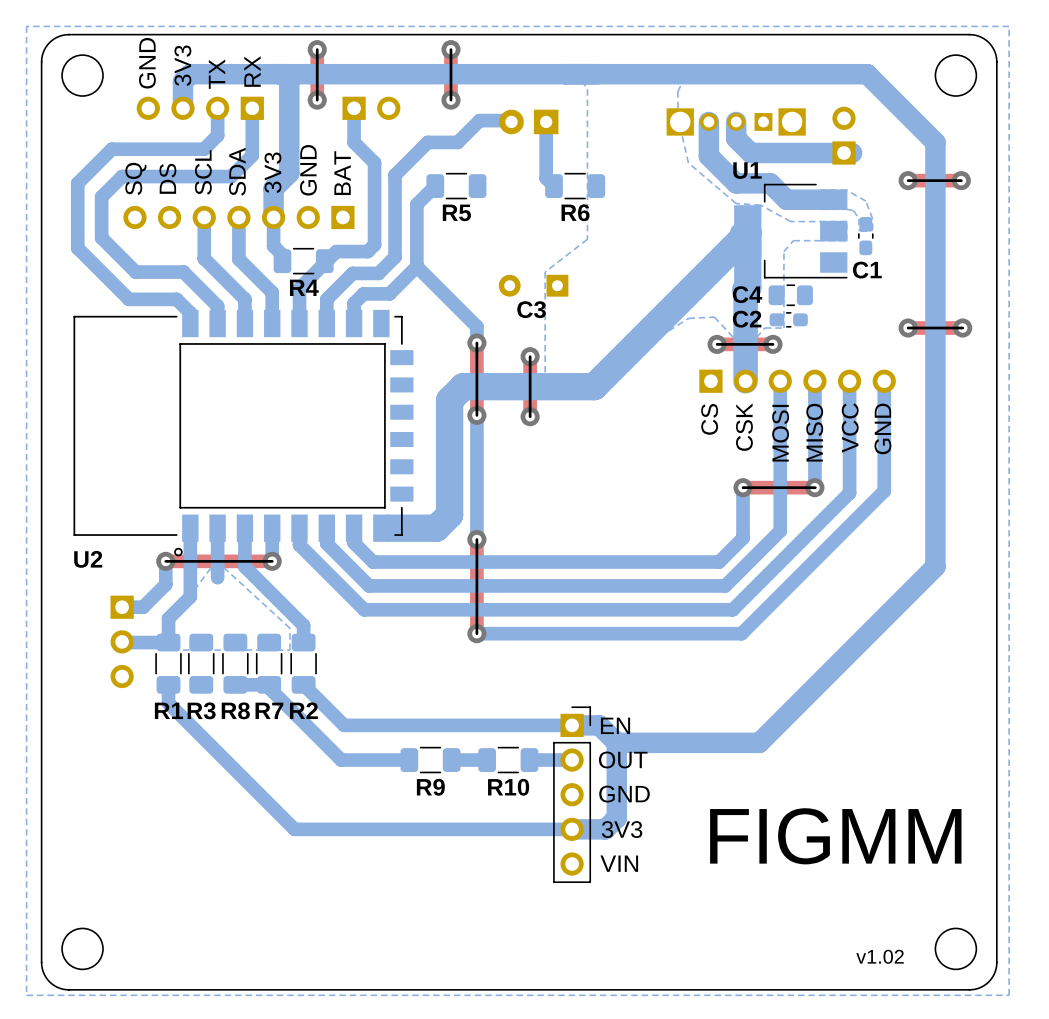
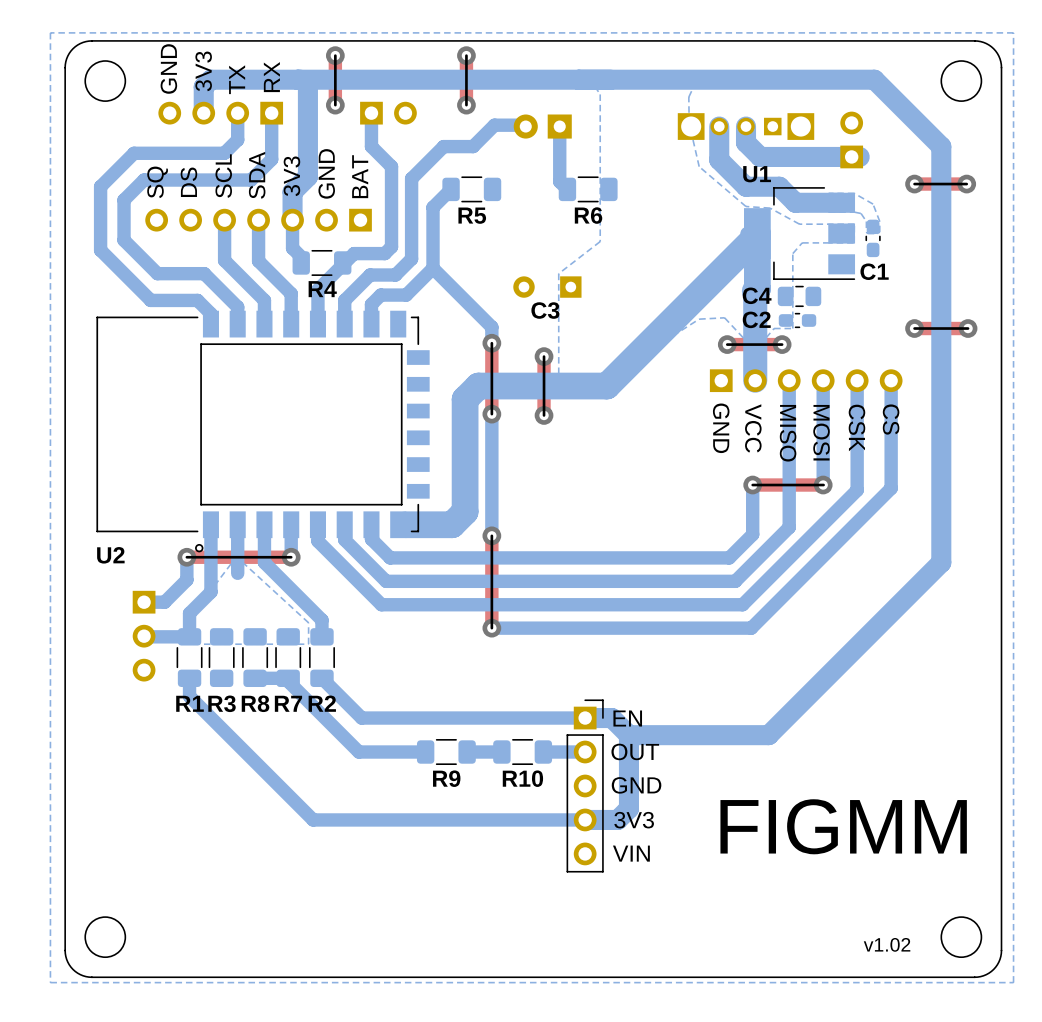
text rotation: 0° (709, 419) -> 180° (891, 419)
text position: CS (709, 419) -> CS (891, 419)
text rotation: 0° (744, 427) -> 180° (856, 427)
text position: CSK (744, 427) -> CSK (856, 427)
text rotation: 0° (850, 428) -> 180° (753, 428)
text position: VCC (850, 428) -> VCC (753, 428)
text rotation: 0° (882, 428) -> 180° (721, 428)
text position: GND (882, 428) -> GND (721, 428)
text rotation: 0° (814, 432) -> 180° (788, 433)
text rotation: 0° (780, 433) -> 180° (821, 432)

